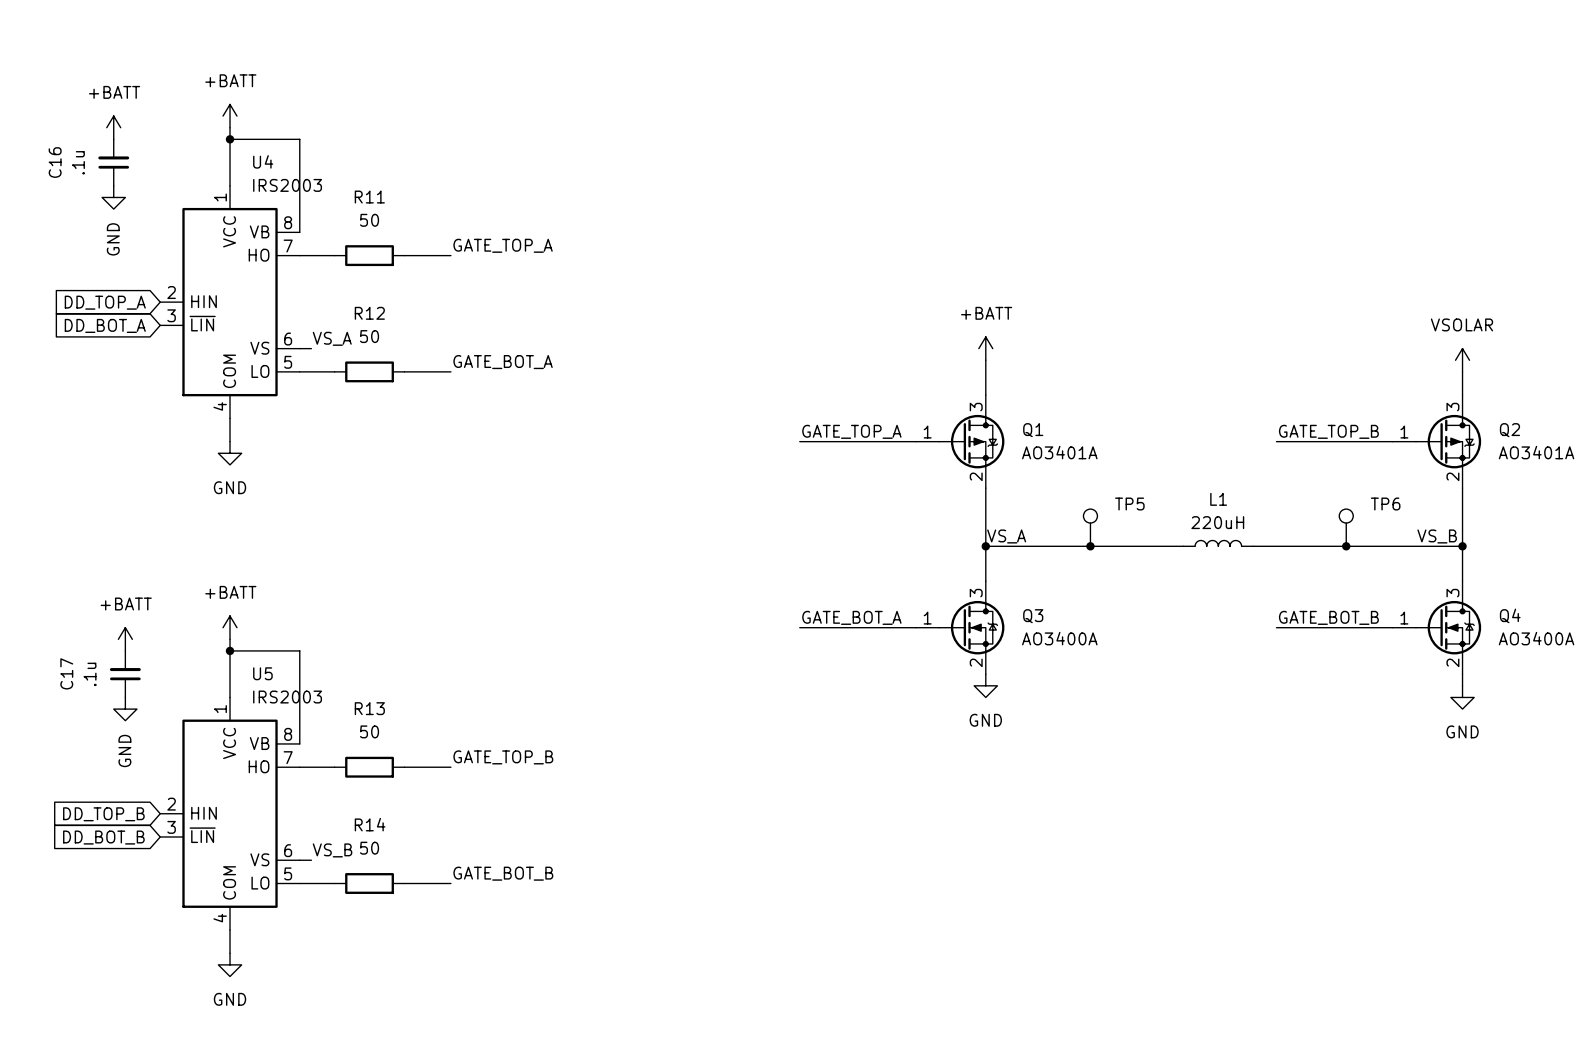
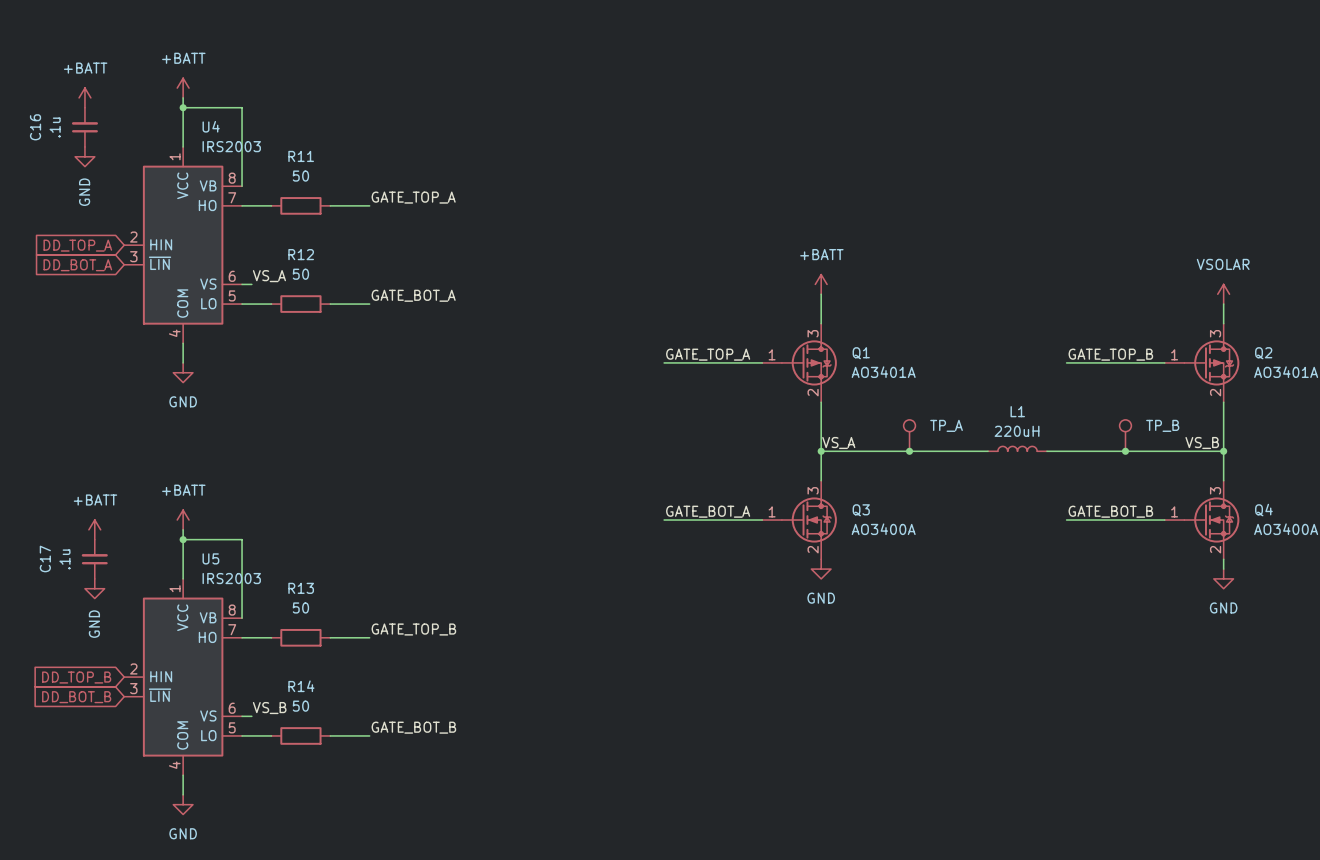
TP5 name: TP5 (1129, 504) -> TP_A (946, 425)
TP6 name: TP6 (1385, 504) -> TP_B (1162, 425)

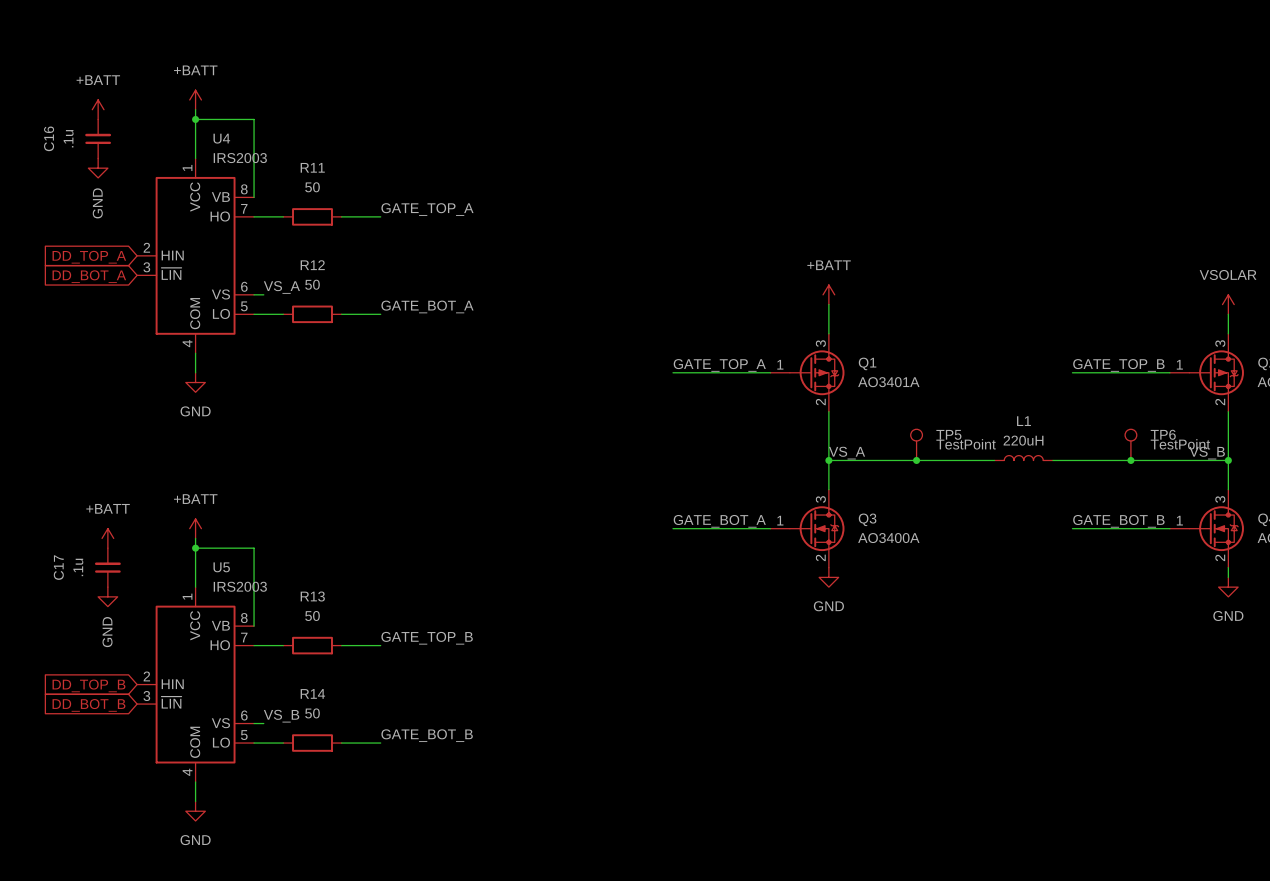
TP_A name: TP_A (946, 425) -> TP5 (948, 434)
TP_B name: TP_B (1162, 425) -> TP6 (1163, 434)
TP_A value: none -> TestPoint (966, 444)
TP_B value: none -> TestPoint (1180, 444)

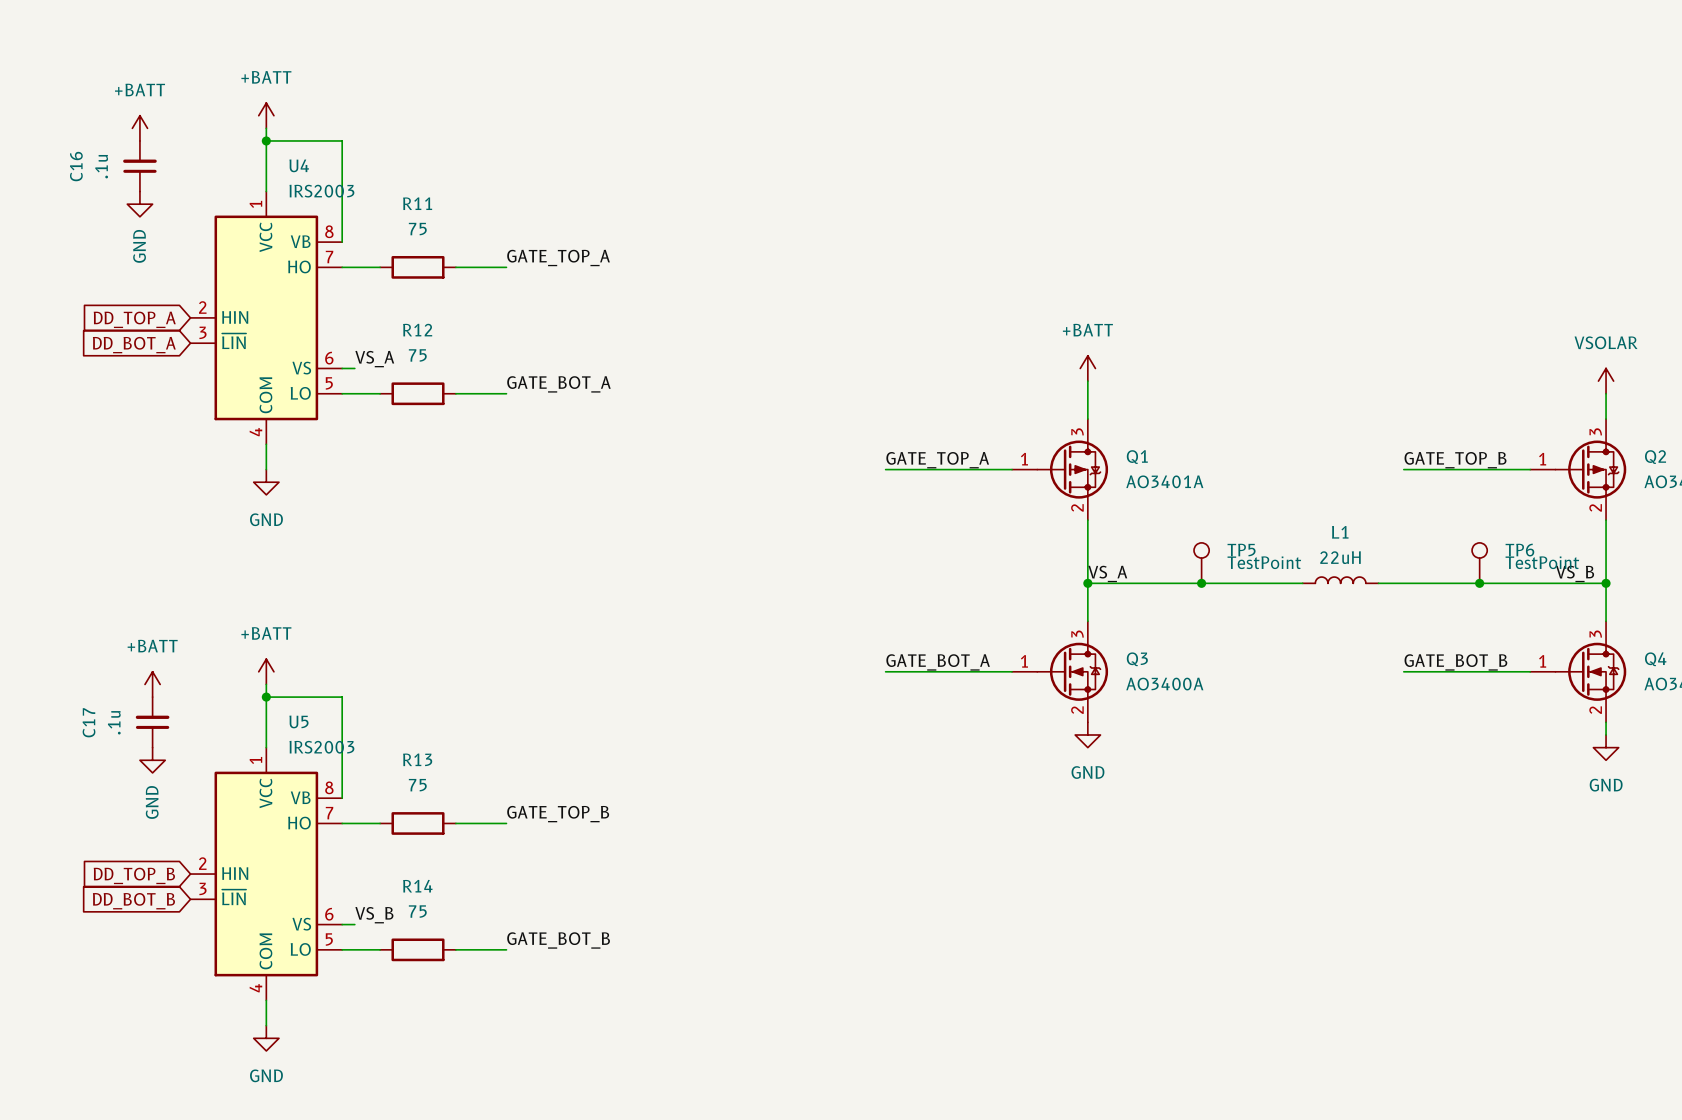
R11 value: 50 (312, 187) -> 75 (417, 229)
R12 value: 50 (312, 284) -> 75 (417, 355)
L1 value: 220uH (1023, 440) -> 22uH (1340, 557)
R13 value: 50 (312, 615) -> 75 (417, 785)
R14 value: 50 (312, 713) -> 75 (417, 911)

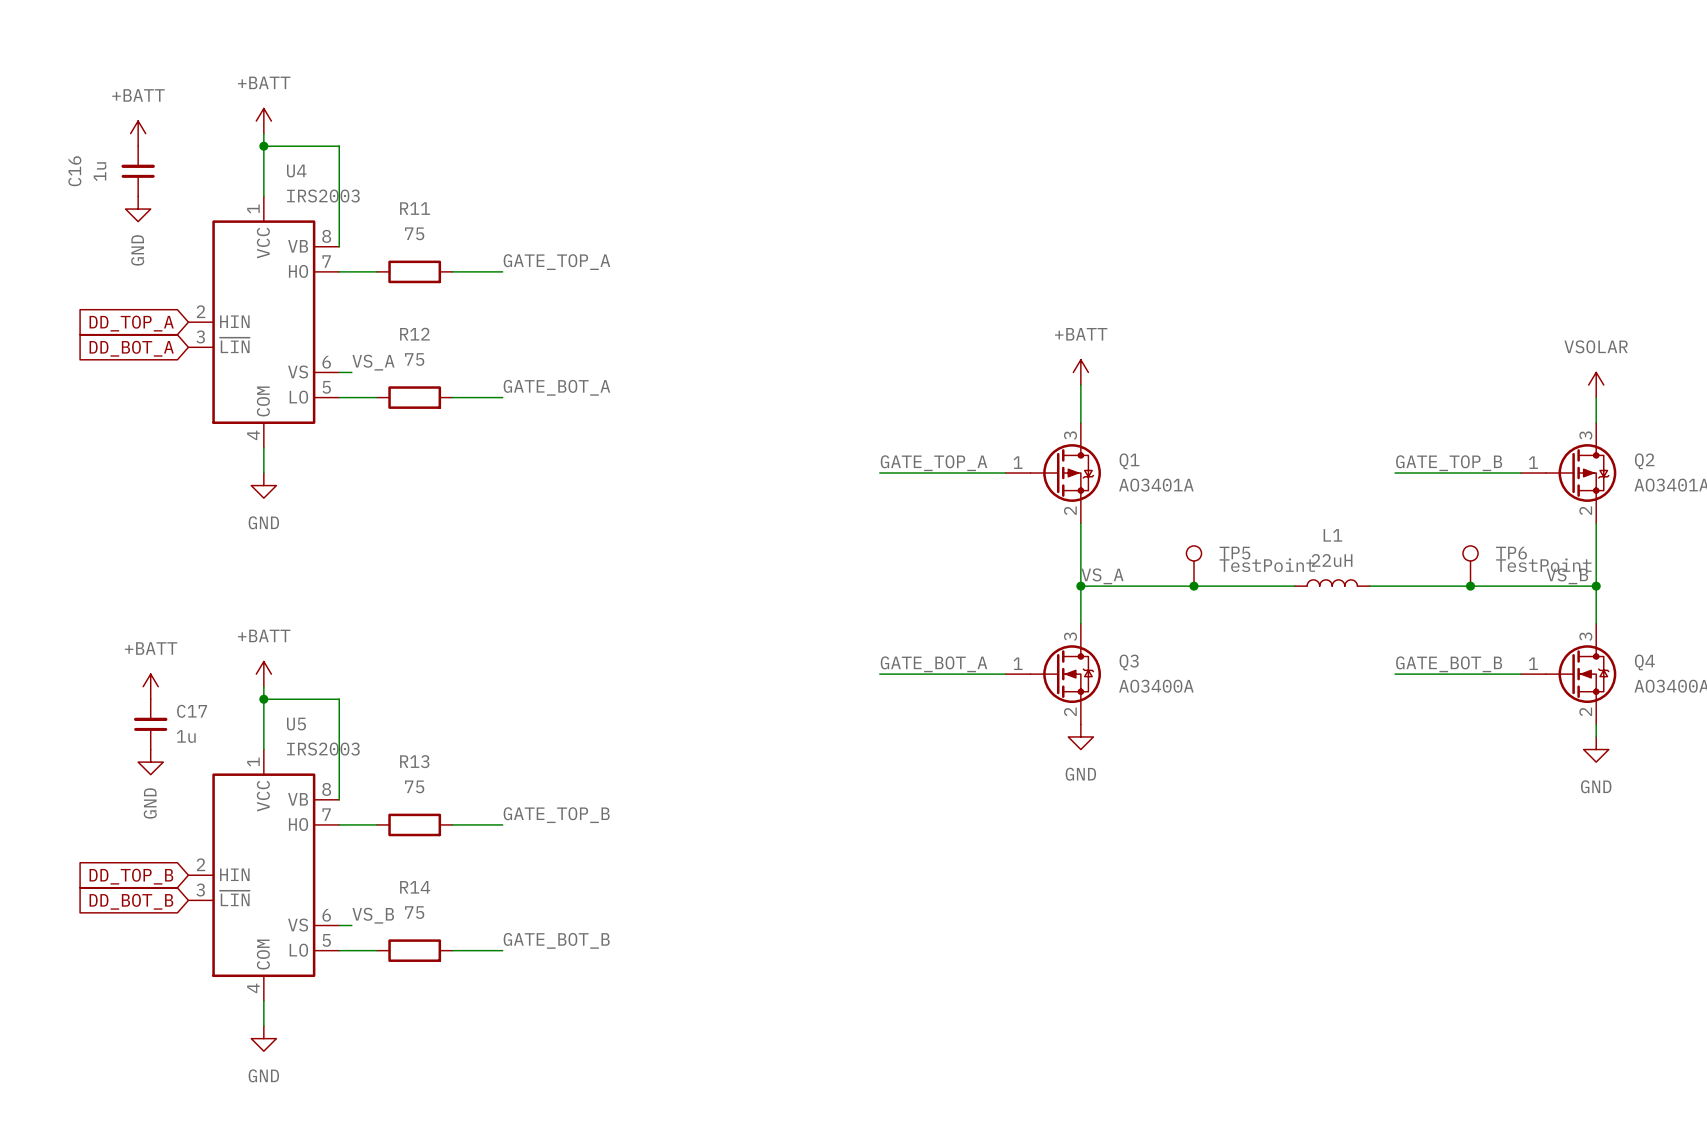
C16 value: .1u (101, 166) -> 1u (100, 171)
C17 name rotation: 0° (88, 722) -> 90° clockwise (192, 711)
C17 name position: C17 (88, 722) -> C17 (192, 711)
C17 value: .1u (114, 722) -> 1u (186, 736)

